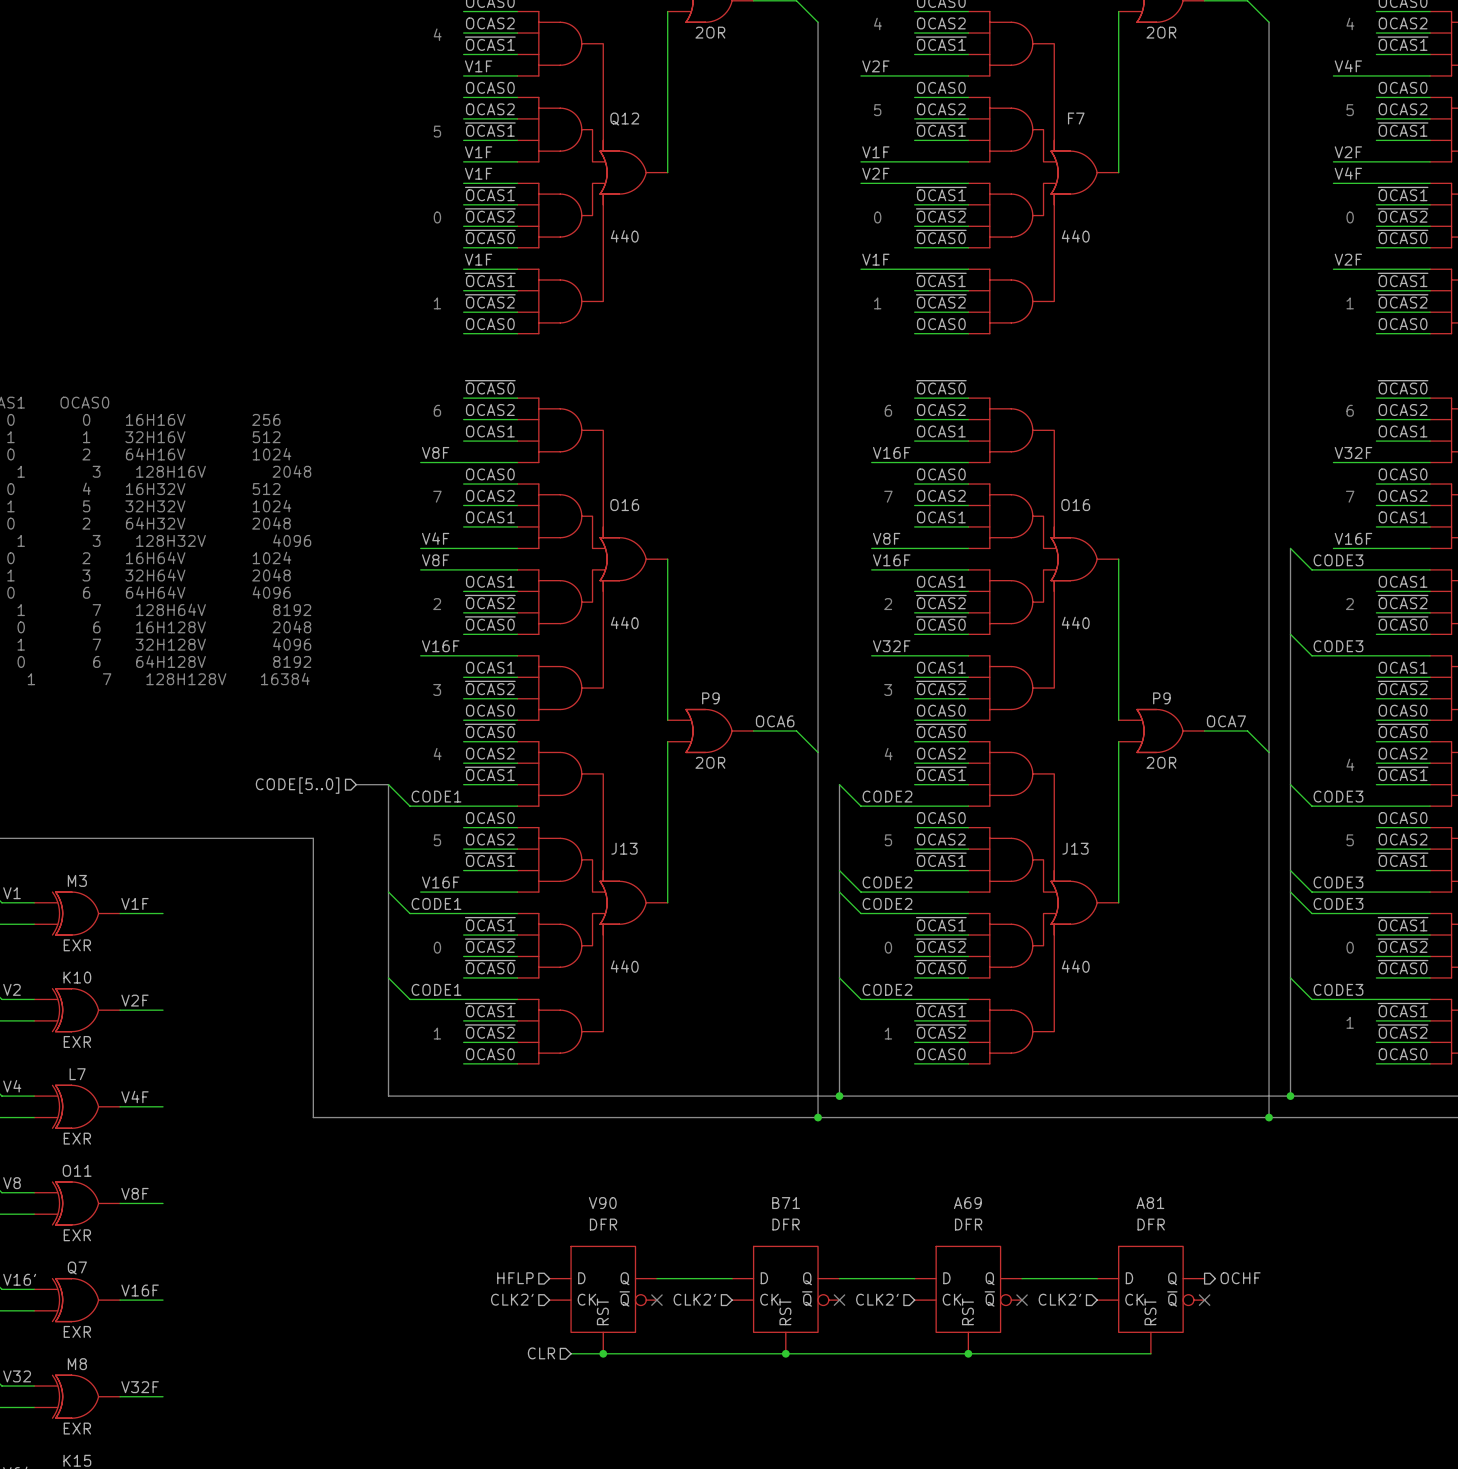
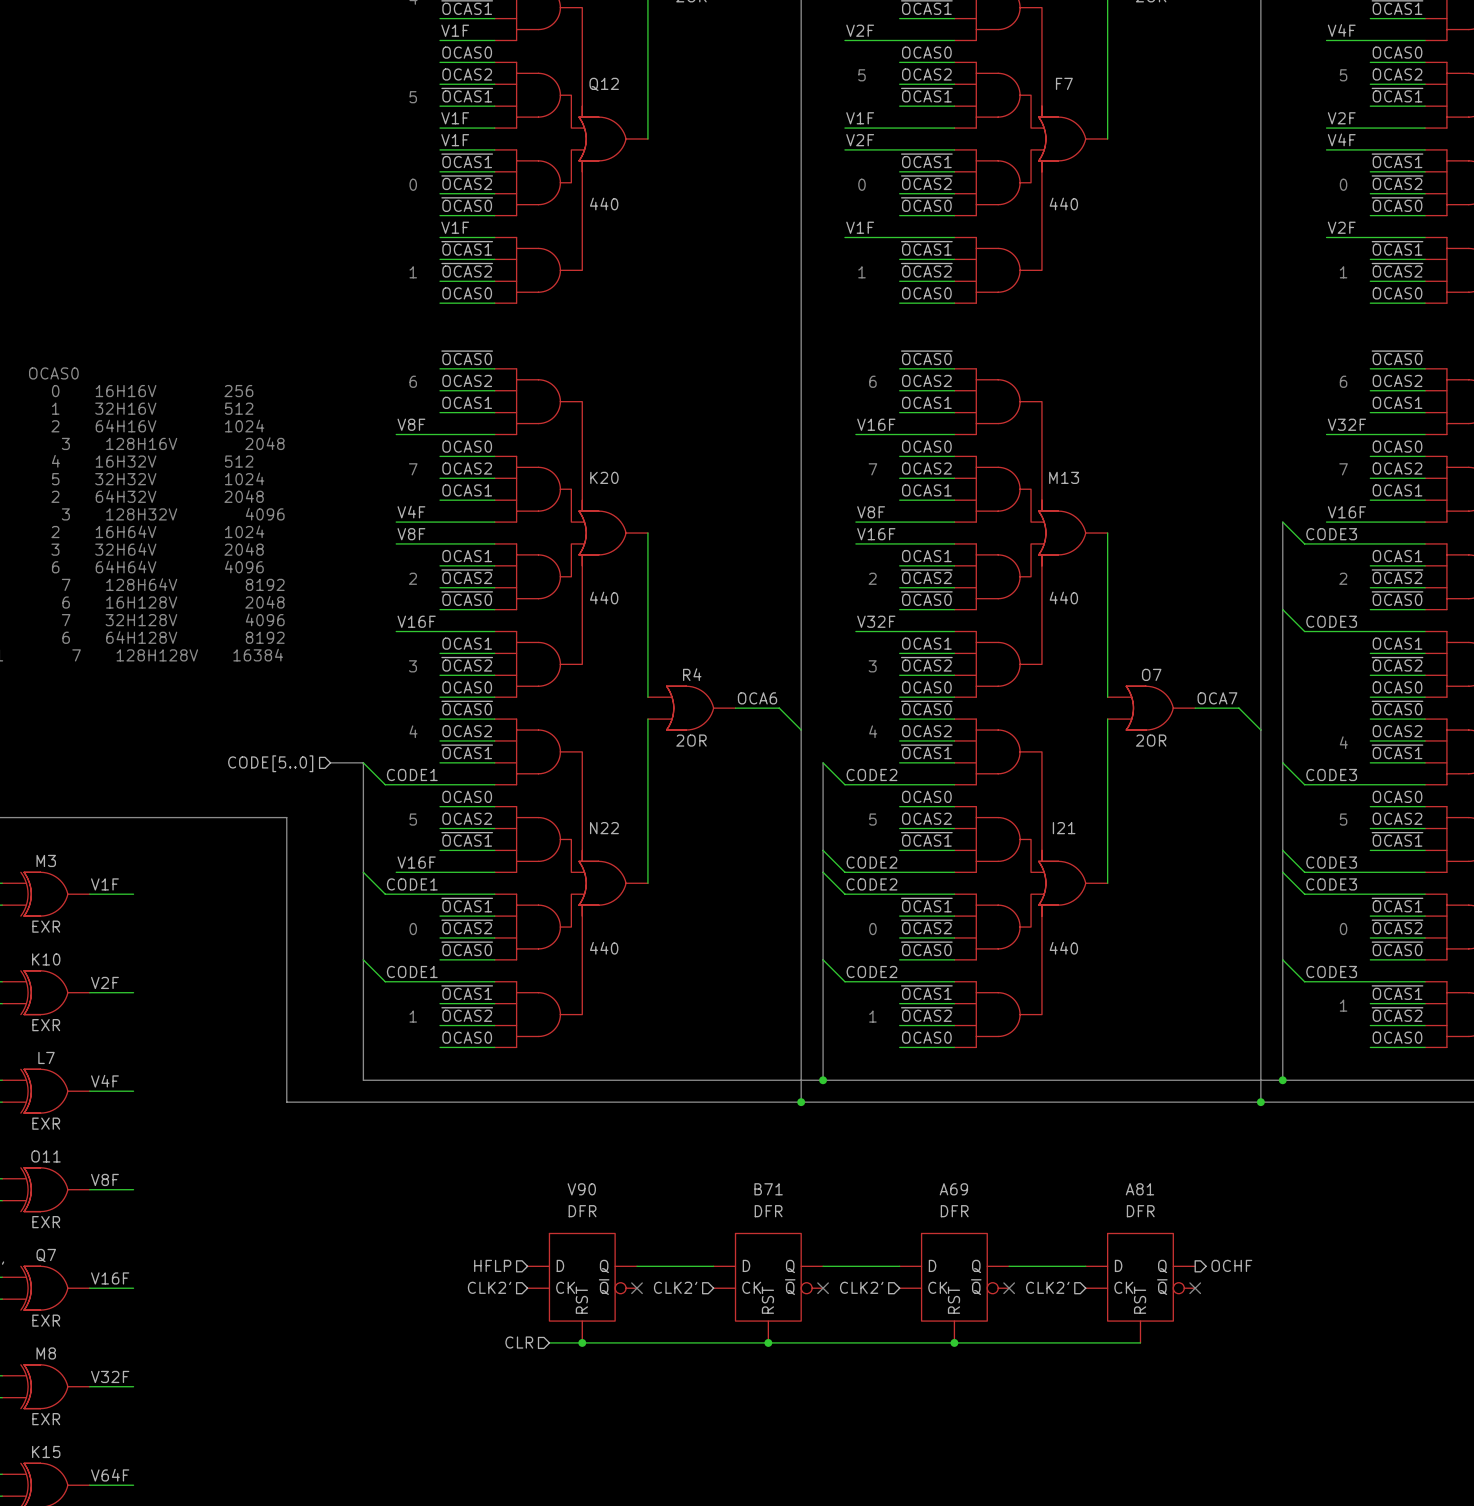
O16 name: O16 (624, 505) -> K20 (604, 477)
O16 name: O16 (1075, 505) -> M13 (1064, 477)
P9 name: P9 (710, 698) -> R4 (692, 674)
P9 name: P9 (1161, 698) -> O7 (1151, 674)
J13 name: J13 (624, 848) -> N22 (604, 828)
J13 name: J13 (1075, 848) -> I21 (1064, 828)

